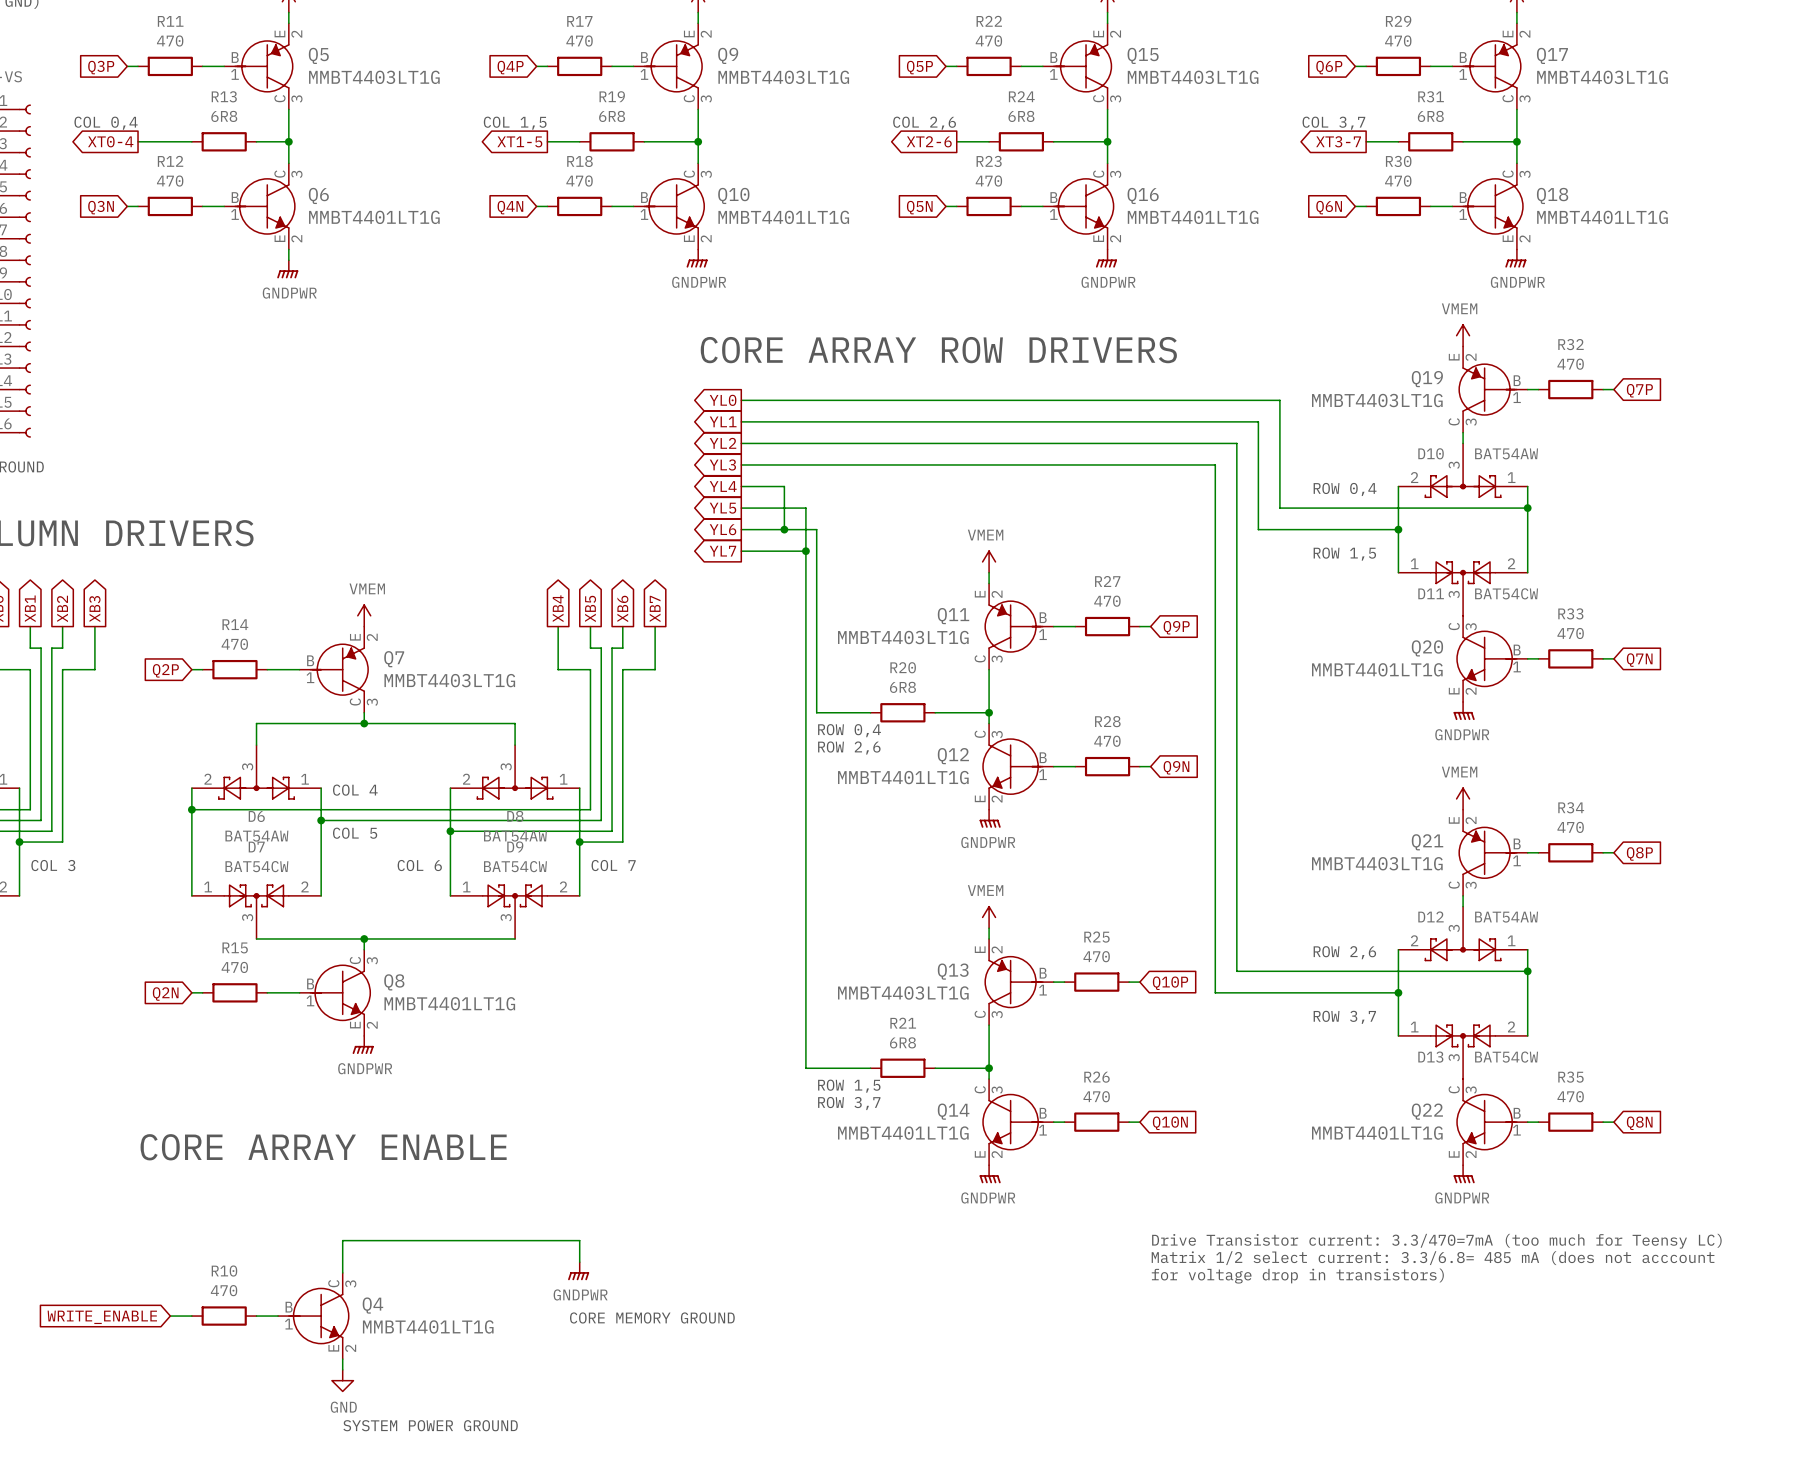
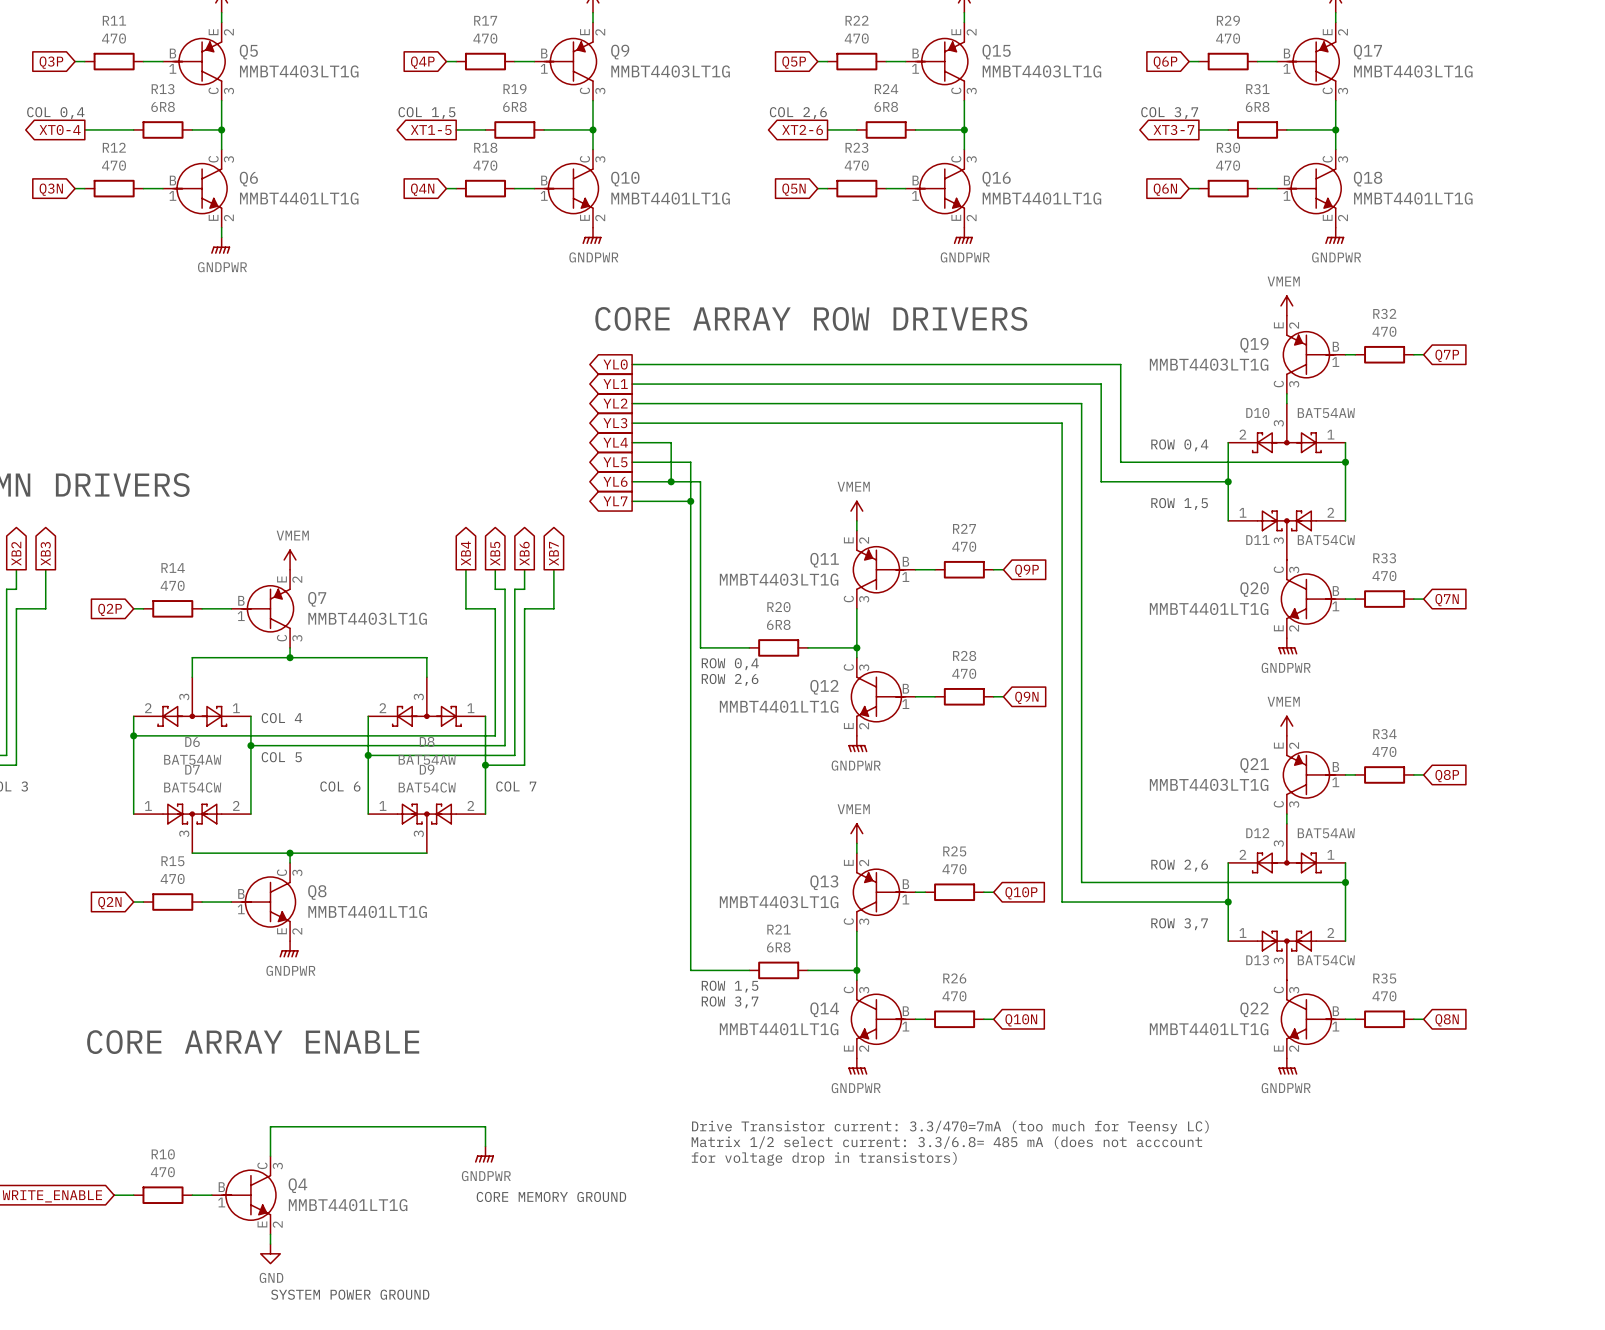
text: none -> Drive Transistor current: 3.3/470=7mA (too much for Teensy LC) (950, 1127)
text: Drive Transistor current: 3.3/470=7mA (too much for Teensy LC) (1436, 1241) -> none
text: none -> Matrix 1/2 select current: 3.3/6.8= 485 mA (does not acccount (946, 1142)
text: Matrix 1/2 select current: 3.3/6.8= 485 mA (does not acccount (1433, 1258) -> none
text: none -> for voltage drop in transistors) (824, 1158)
text: for voltage drop in transistors) (1297, 1276) -> none

